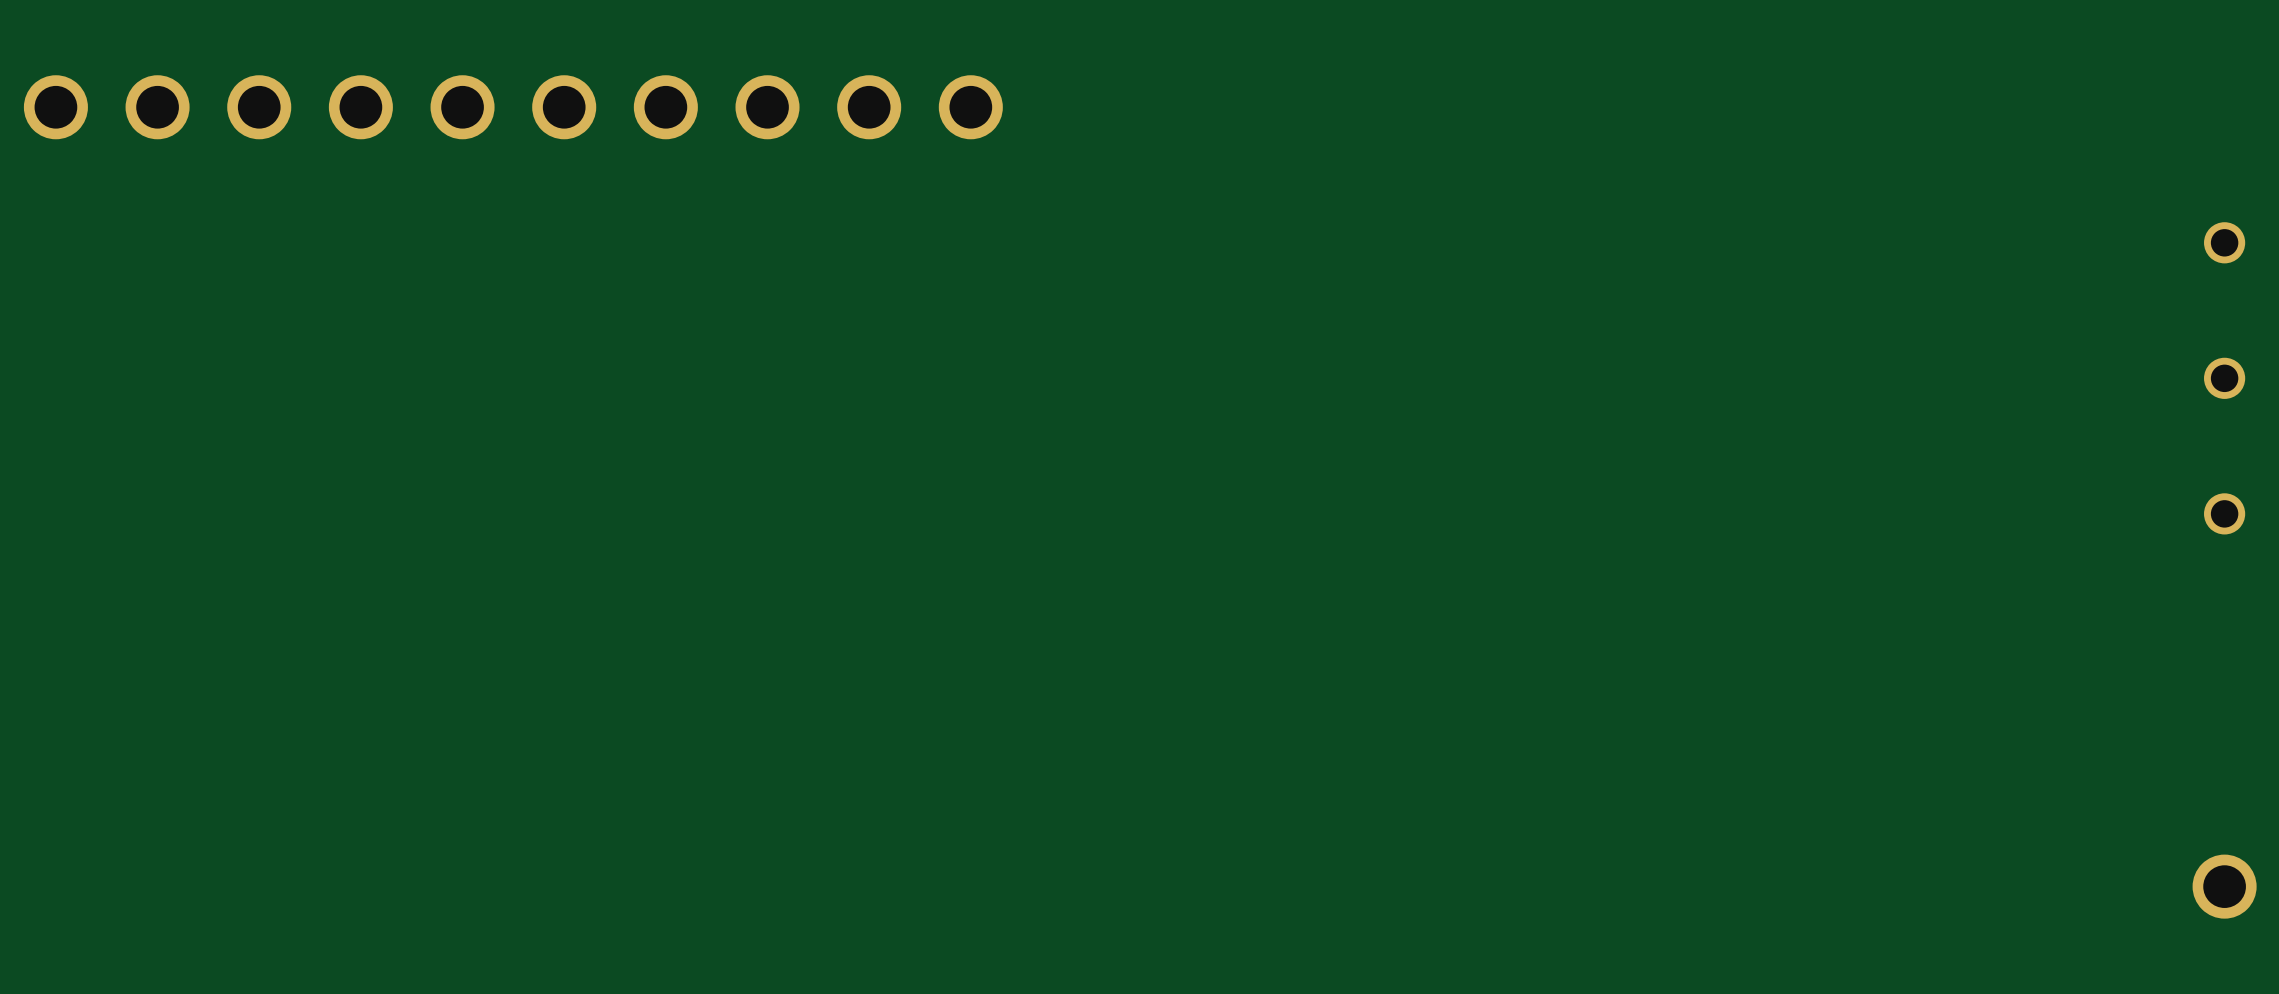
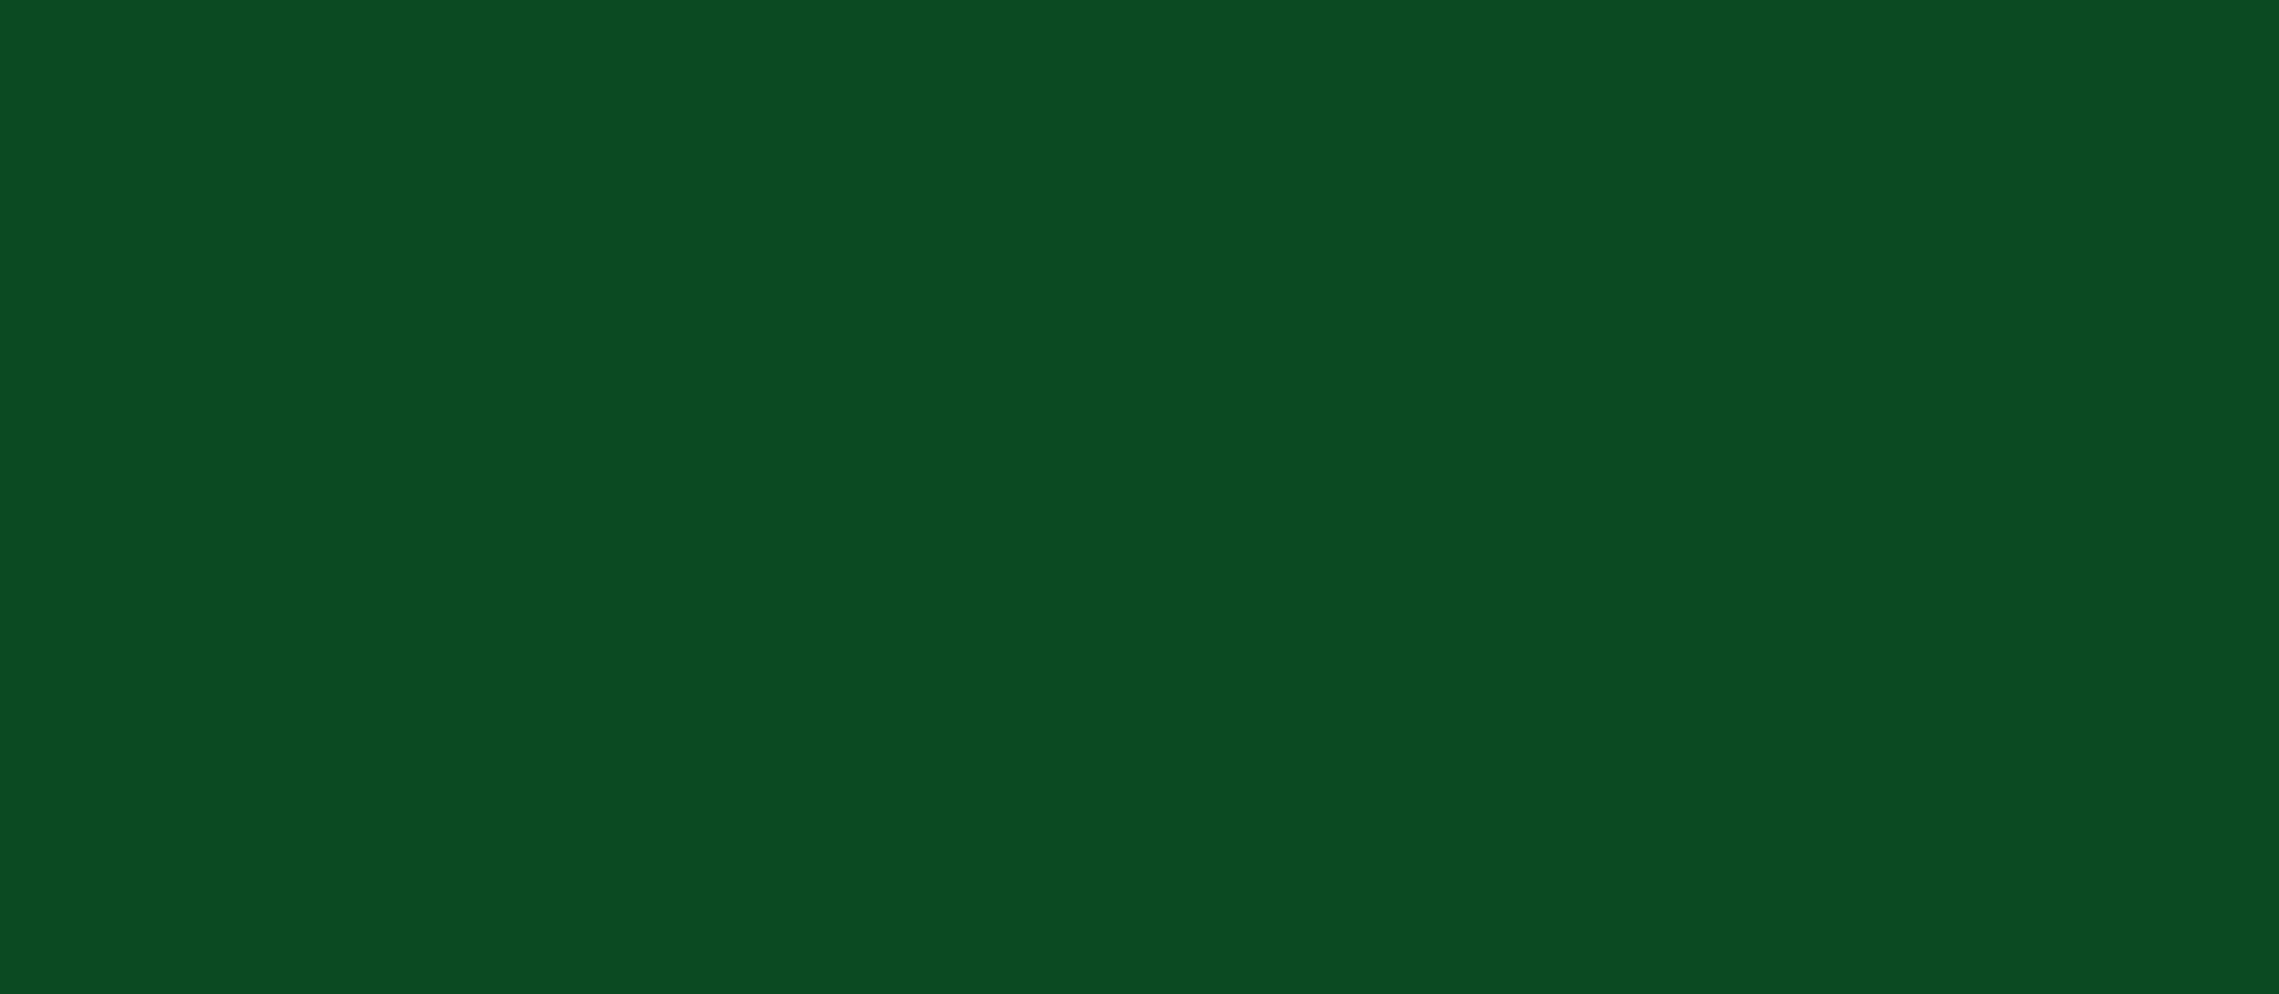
part: (55, 107) -> none
part: (157, 107) -> none
part: (259, 107) -> none
part: (360, 107) -> none
part: (462, 107) -> none
part: (564, 107) -> none
part: (665, 107) -> none
part: (767, 107) -> none
part: (869, 107) -> none
part: (970, 107) -> none
part: (2224, 242) -> none
part: (2224, 378) -> none
part: (2224, 513) -> none
part: (2224, 886) -> none

